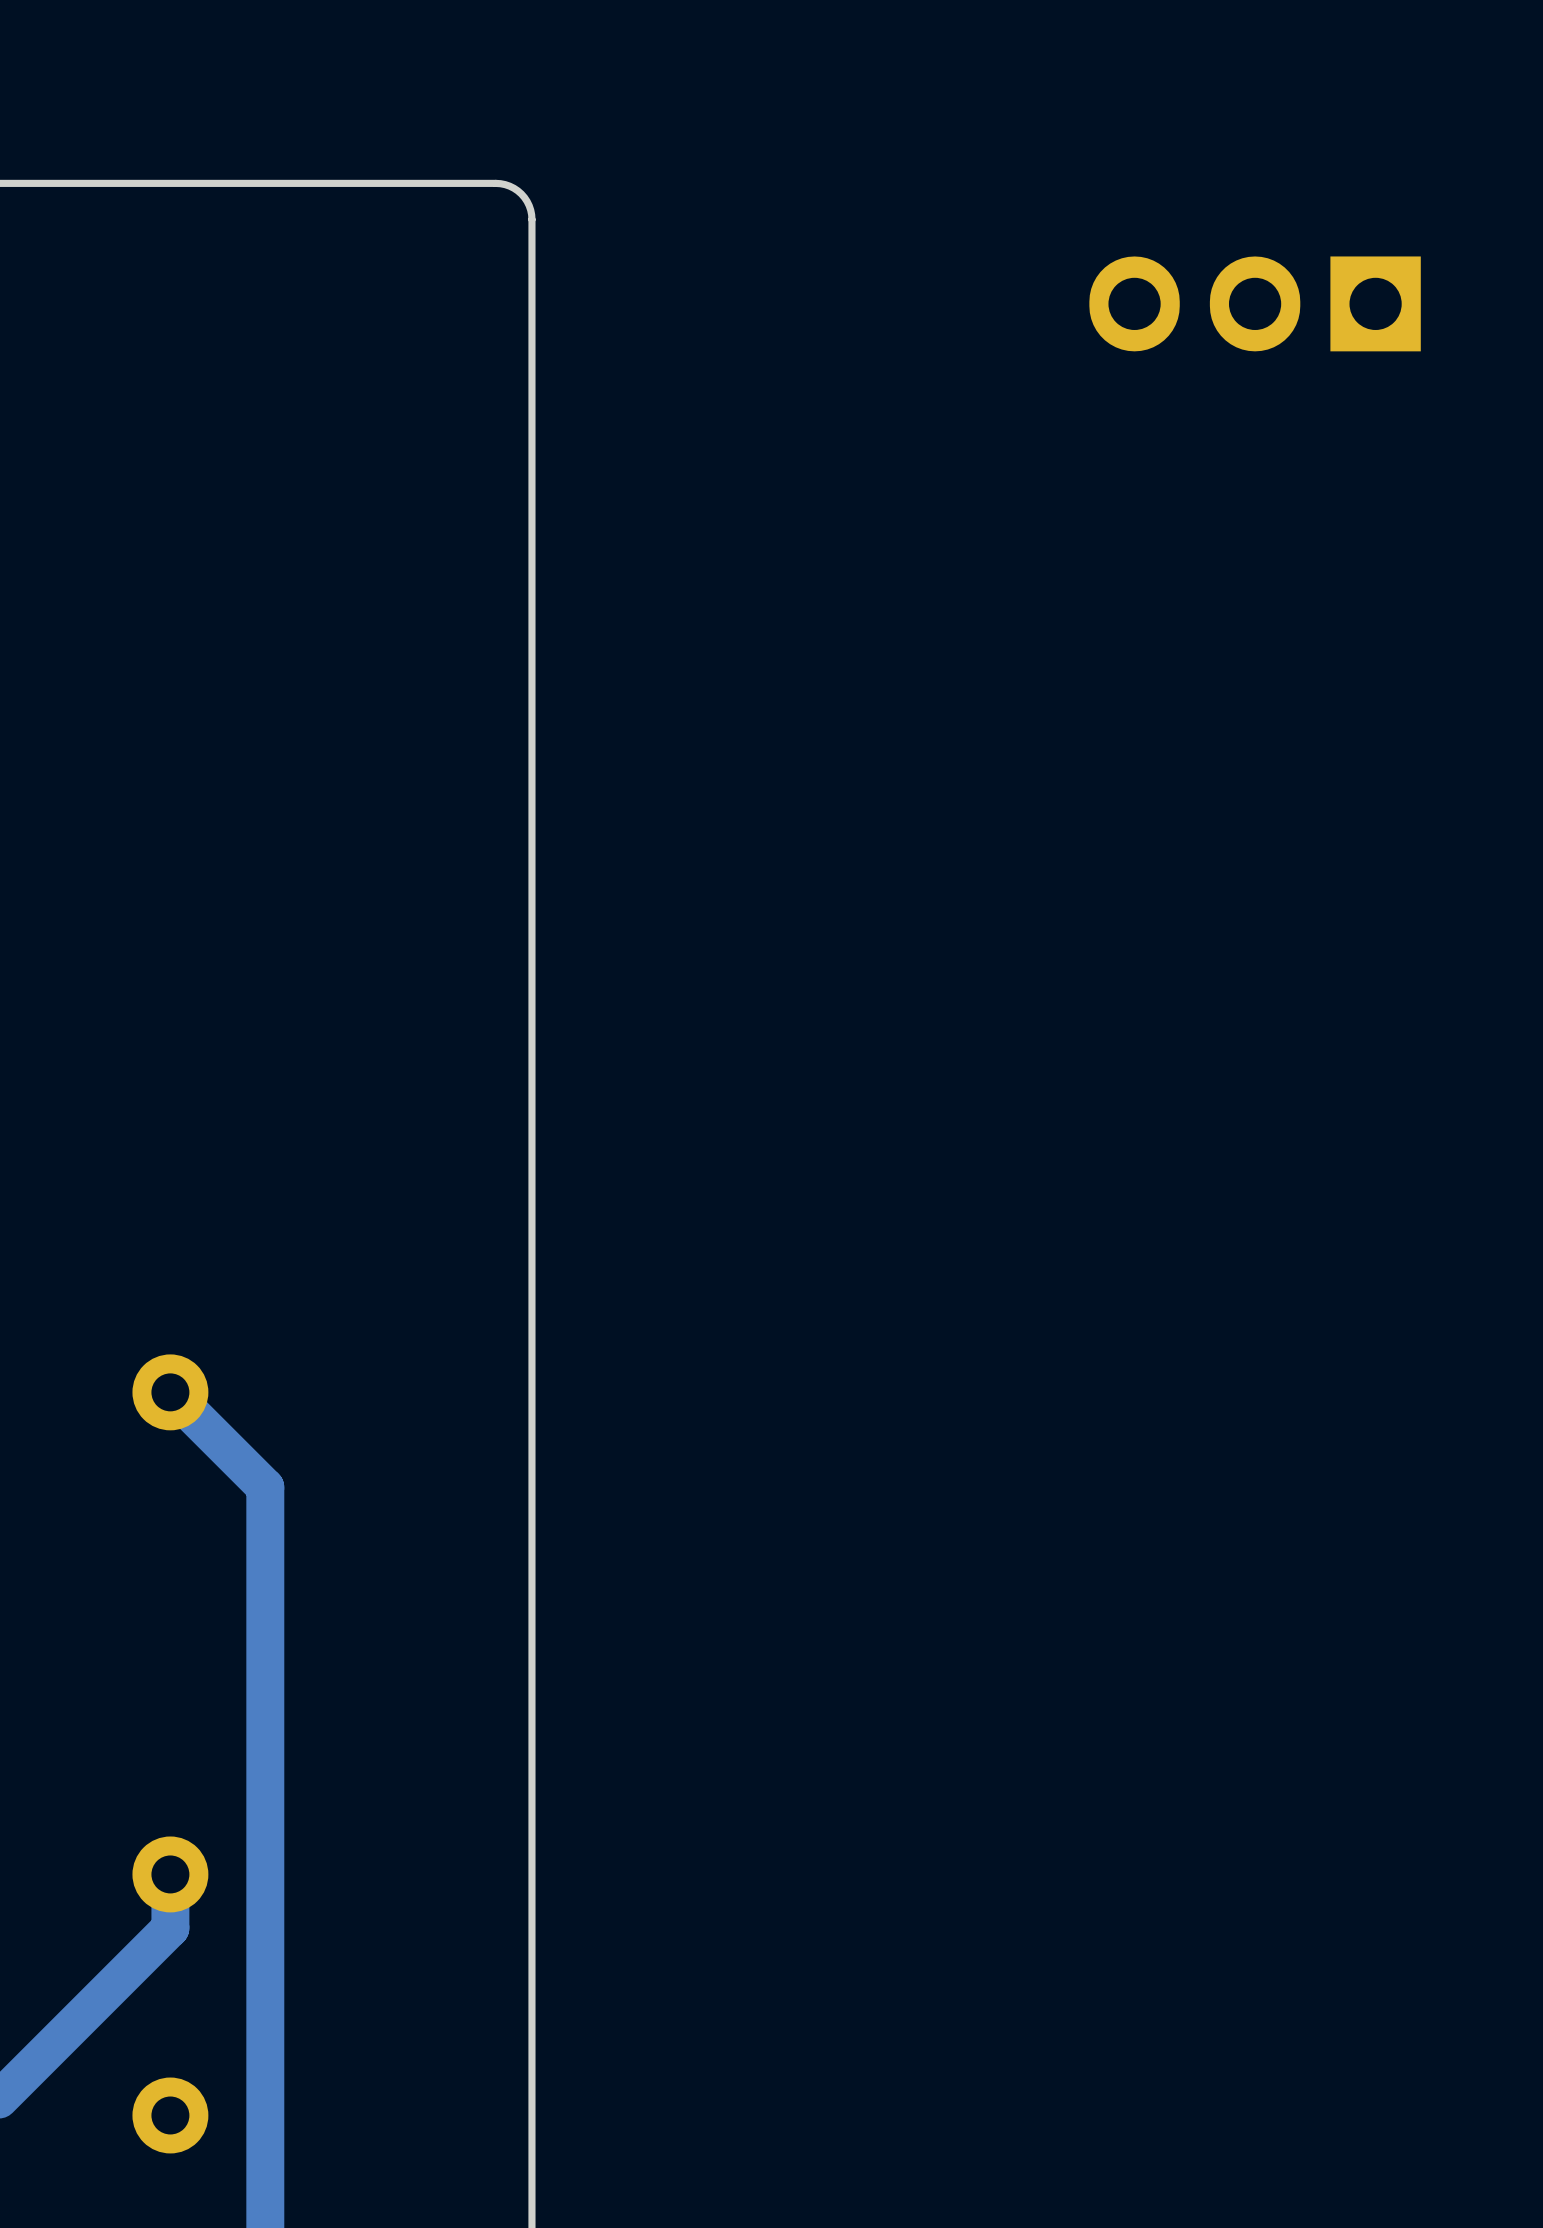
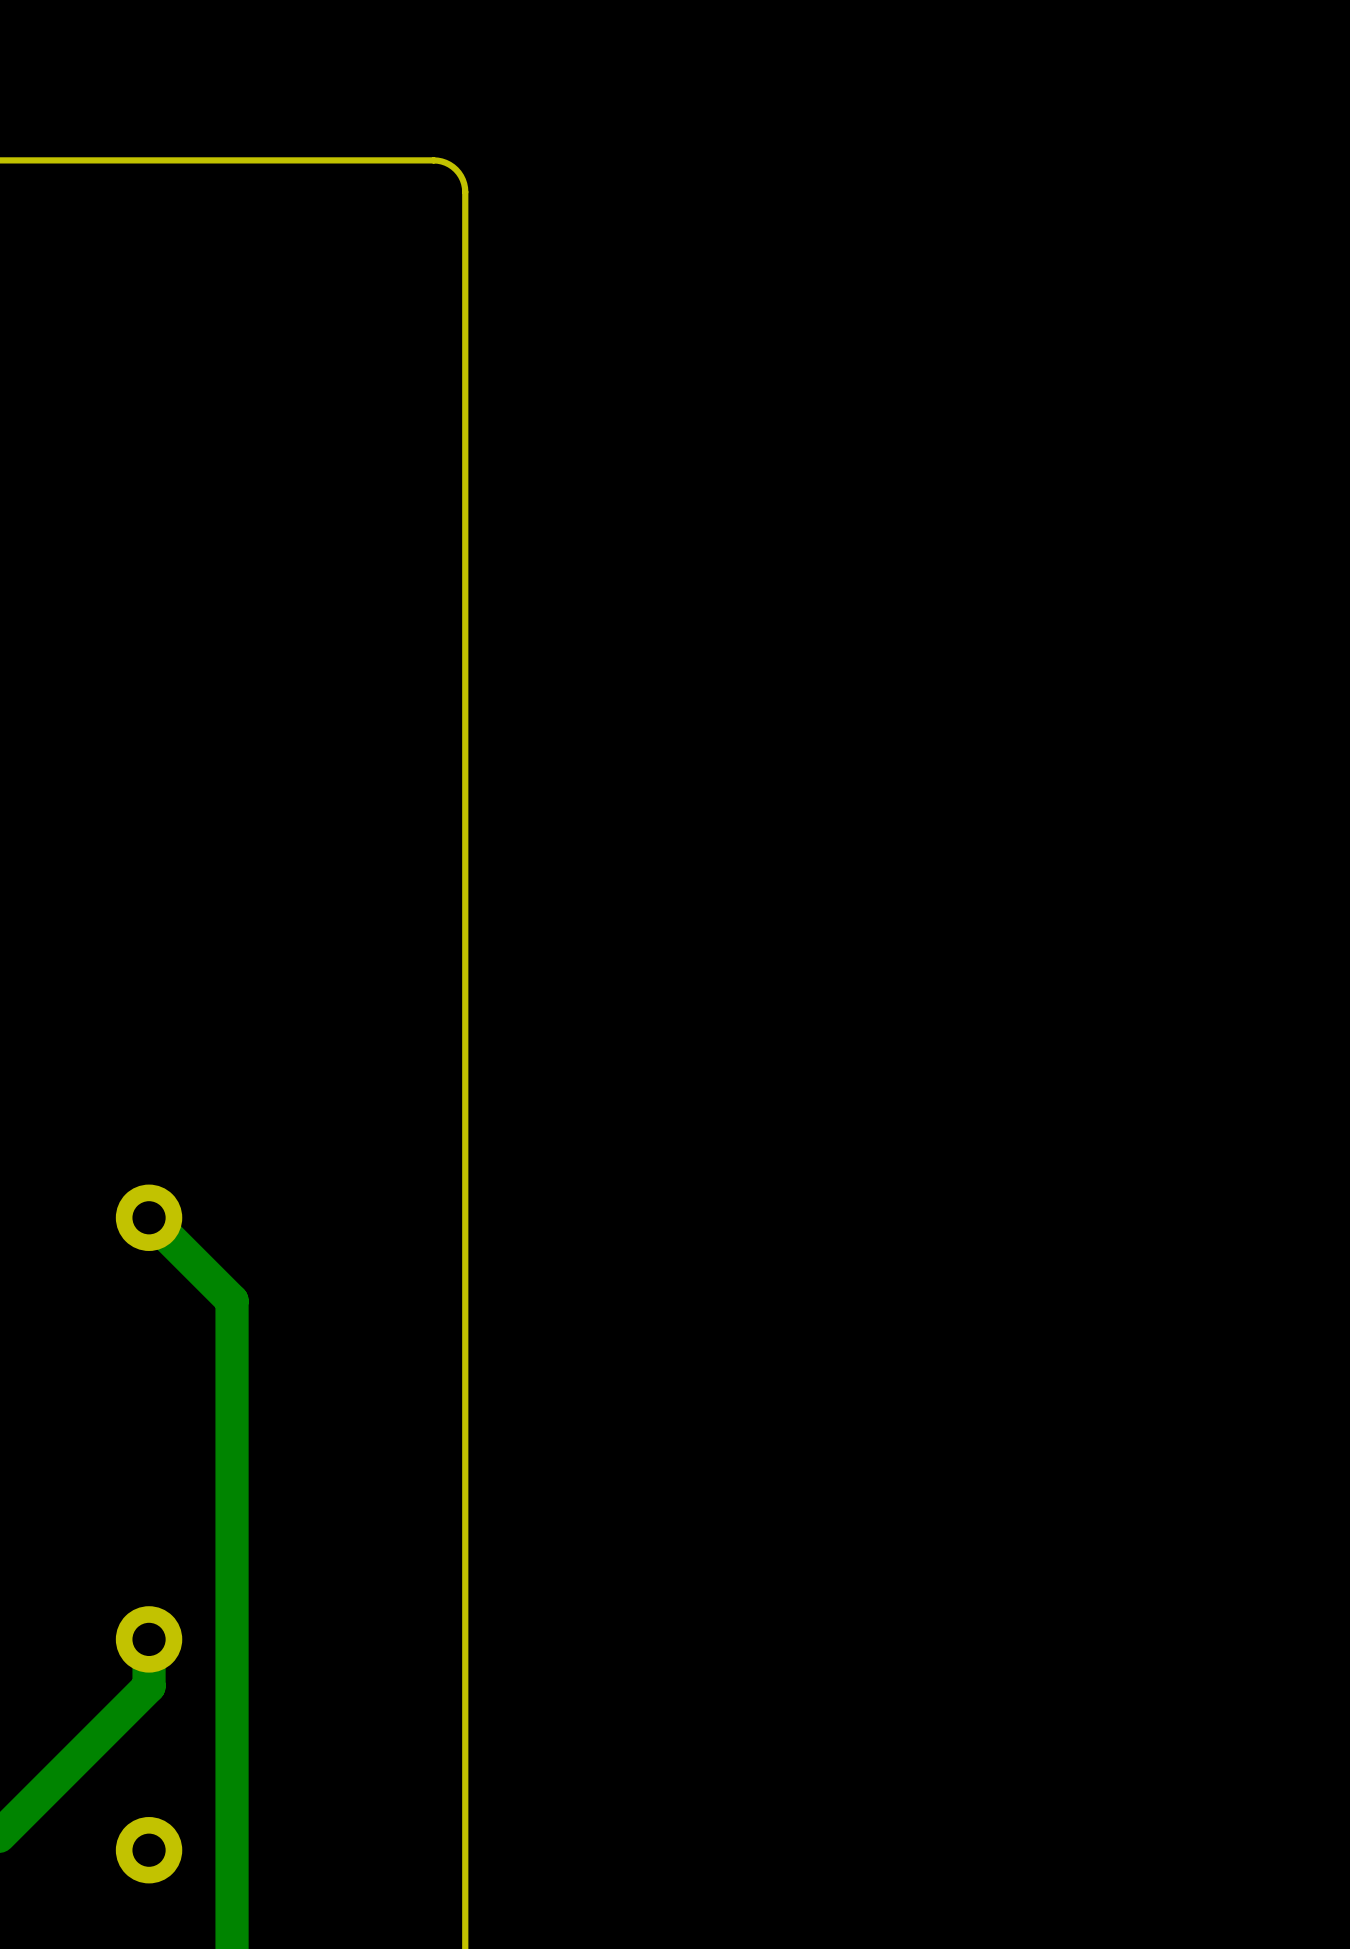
part: (1255, 303) -> none

